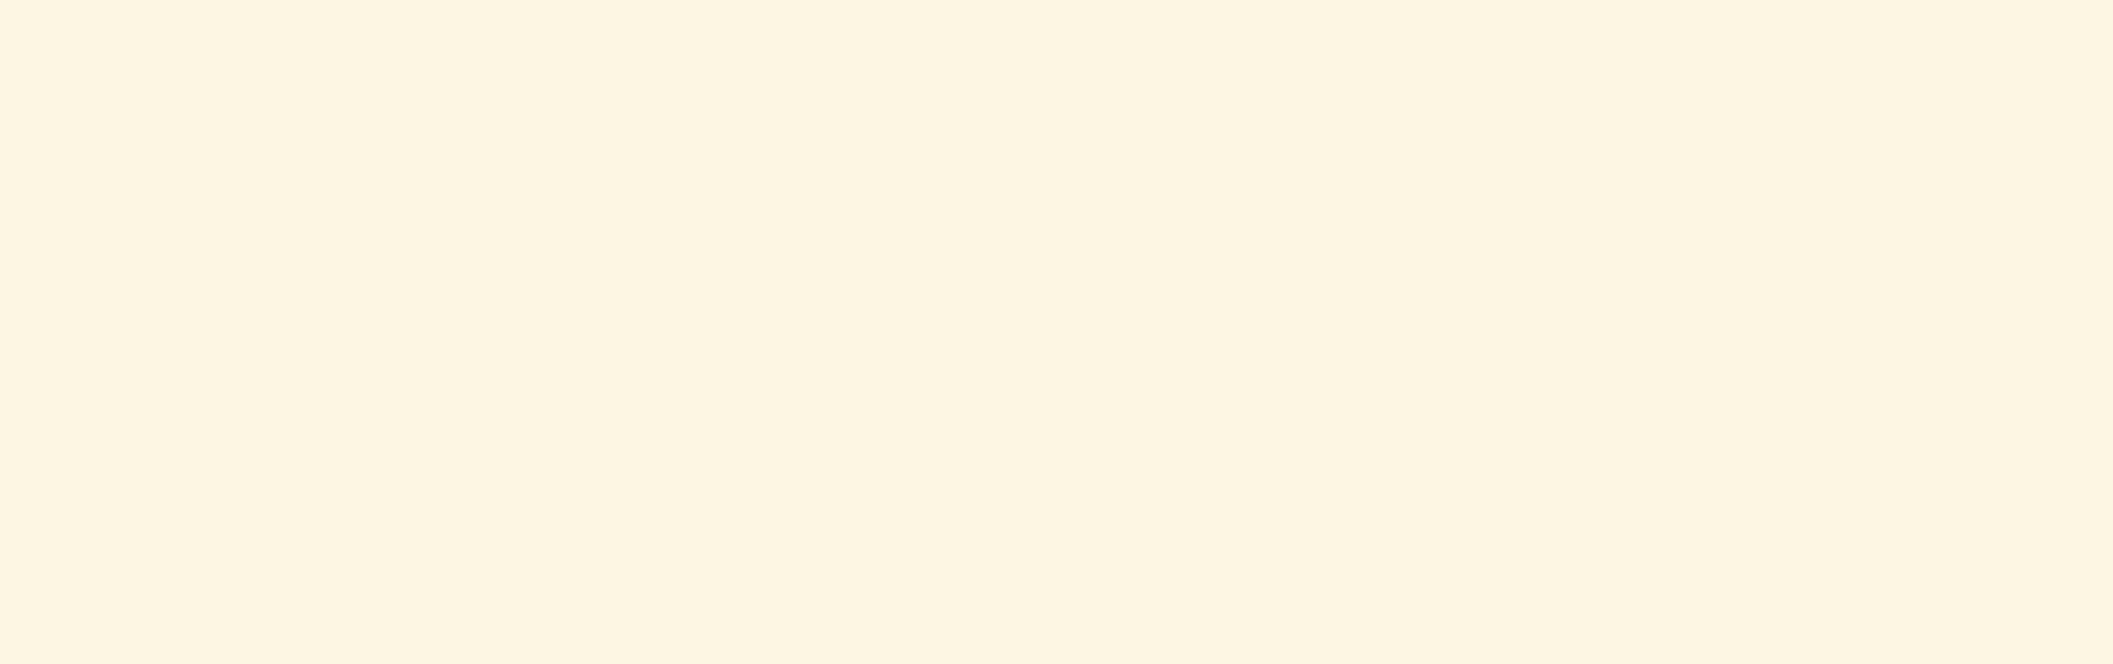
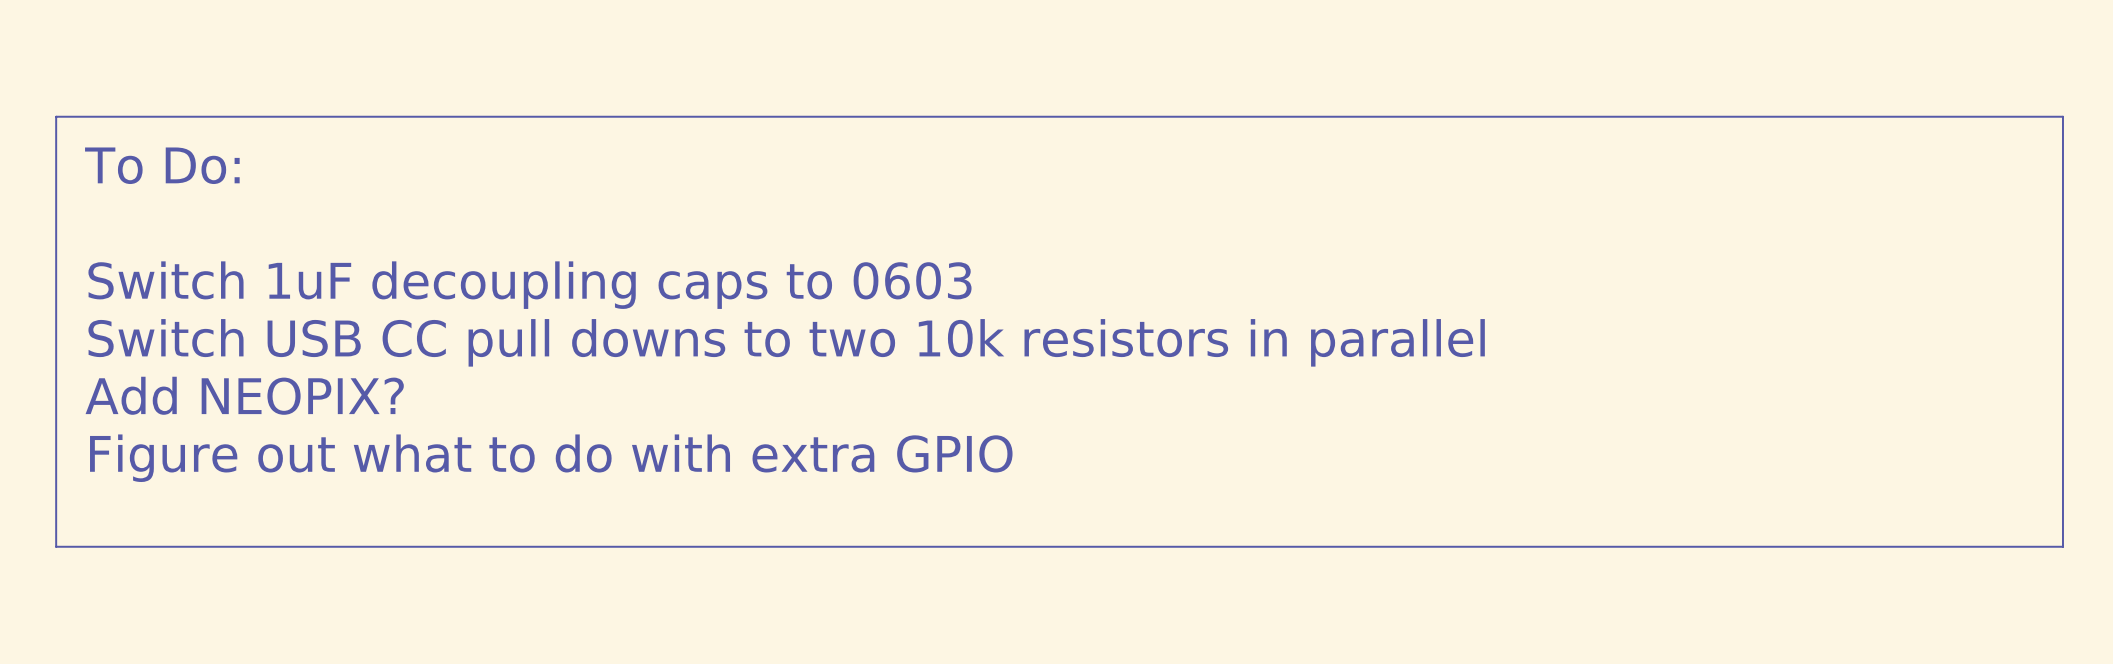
line: none -> (56, 116) (2062, 116) (2062, 546) (56, 546) (56, 116)
text: none -> To Do: (162, 165)
text: none -> Switch 1uF decoupling caps to 0603 (529, 285)
text: none -> Switch USB CC pull downs to two 10k resistors in parallel (786, 342)
text: none -> Add NEOPIX? (244, 395)
text: none -> Figure out what to do with extra GPIO (551, 458)

